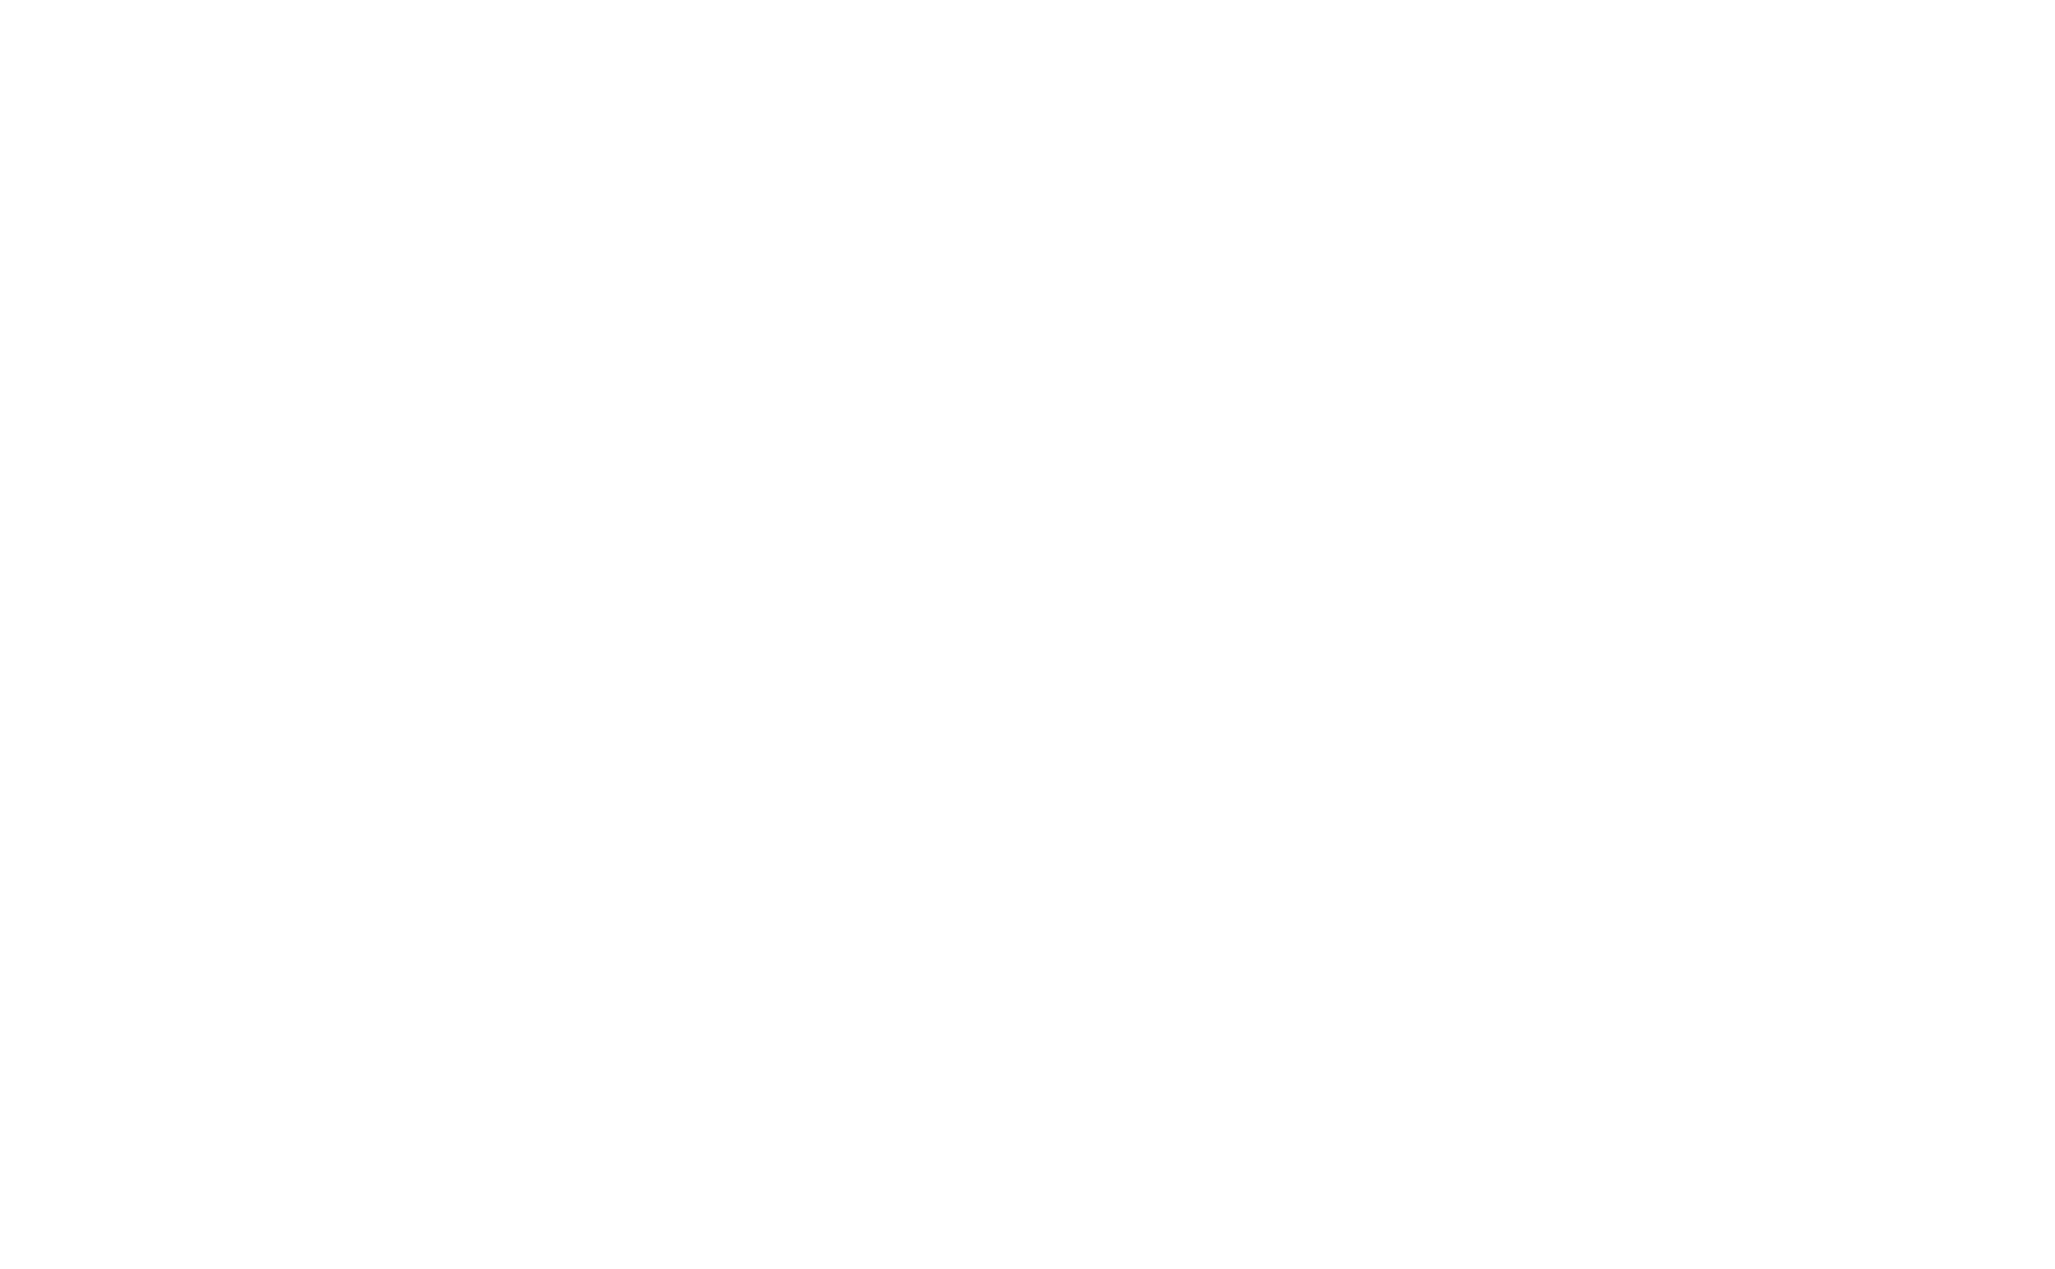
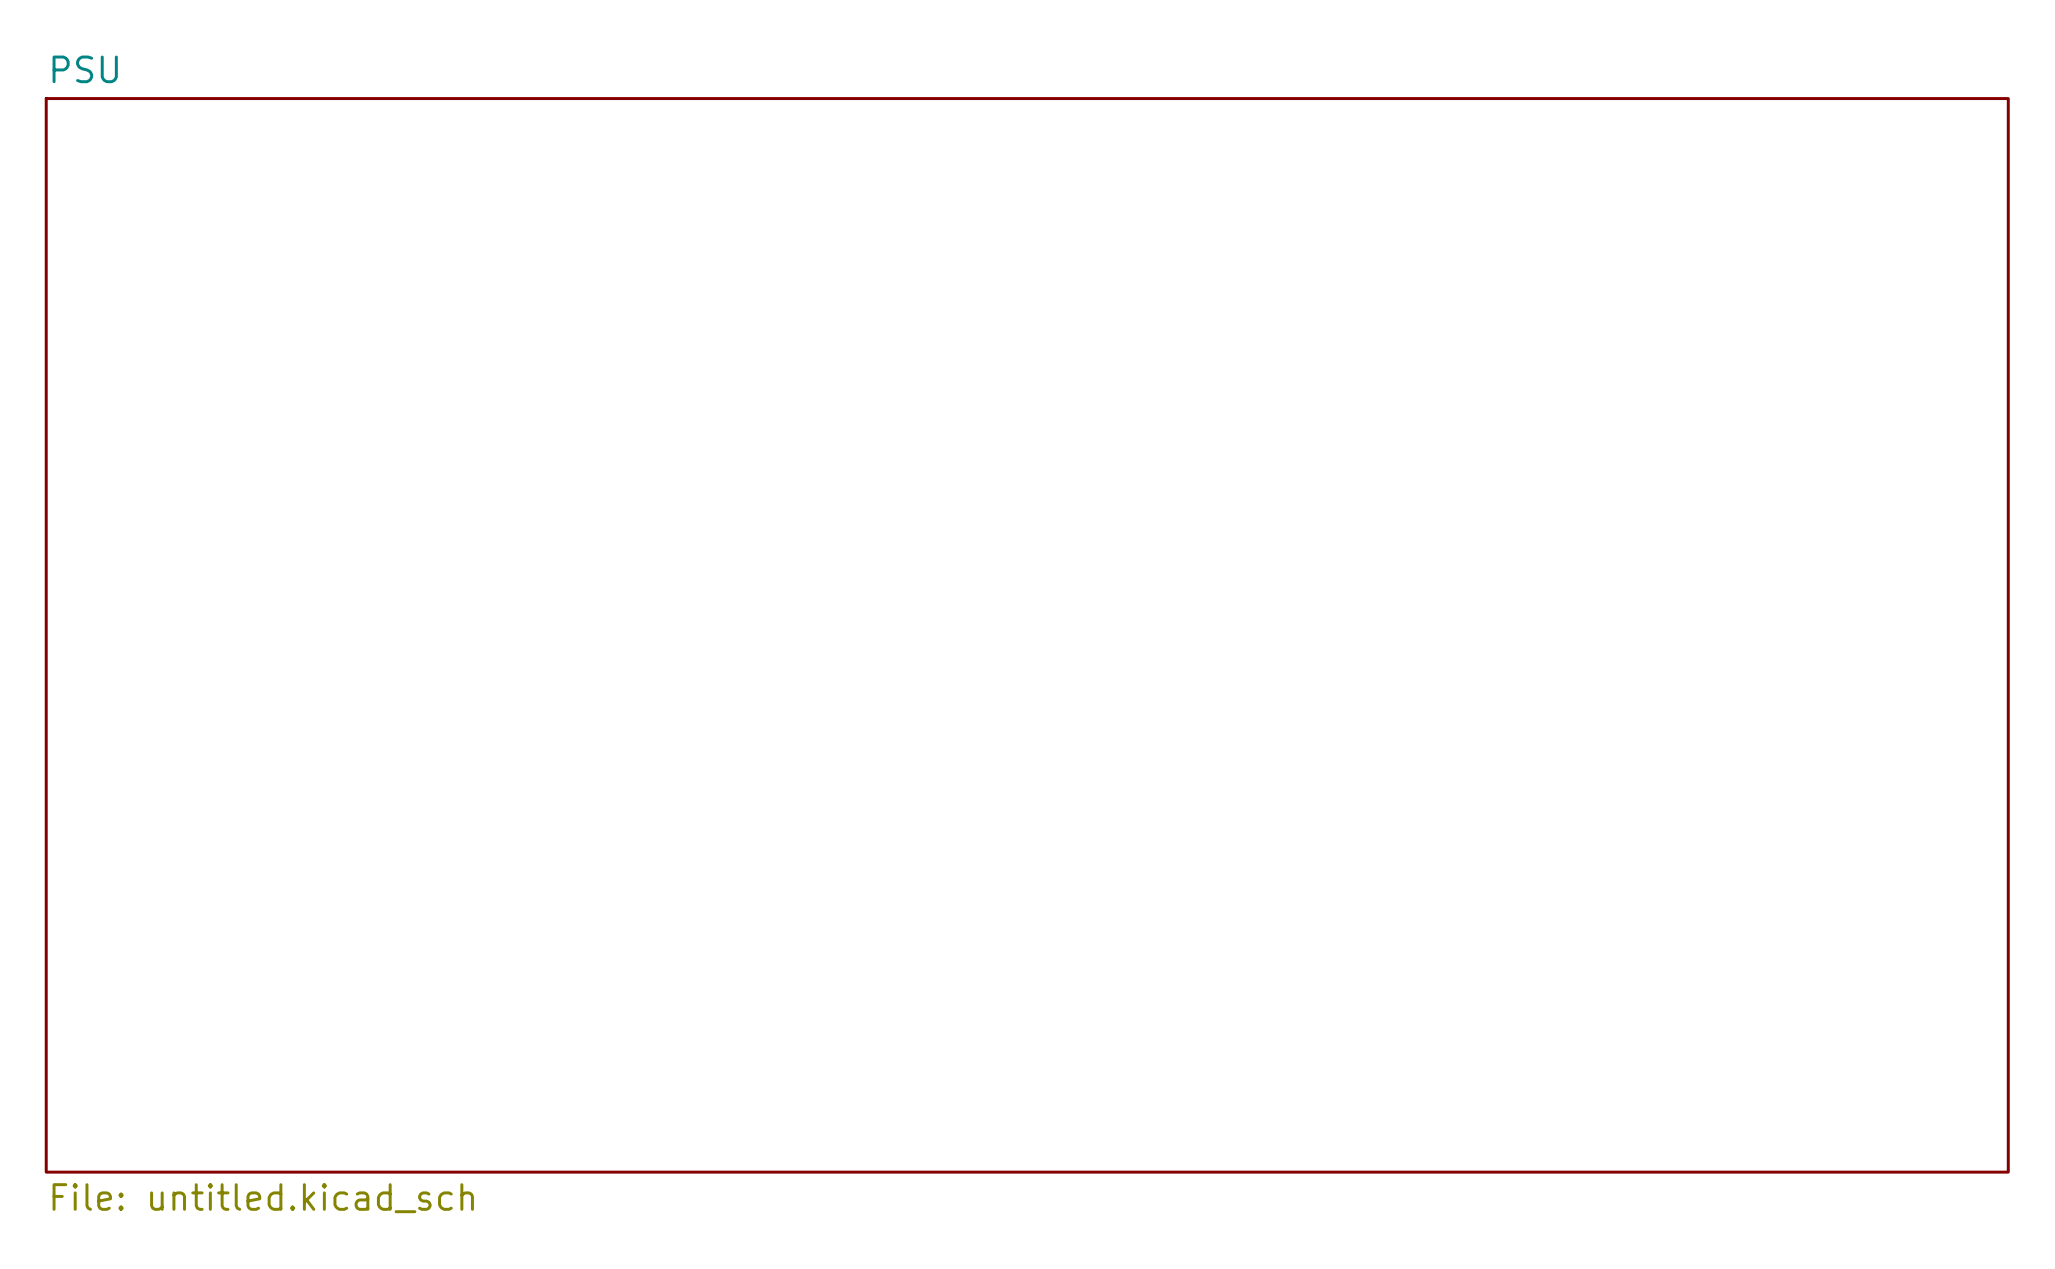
sheet PSU: none -> File: untitled.kicad_sch (1027, 635)

